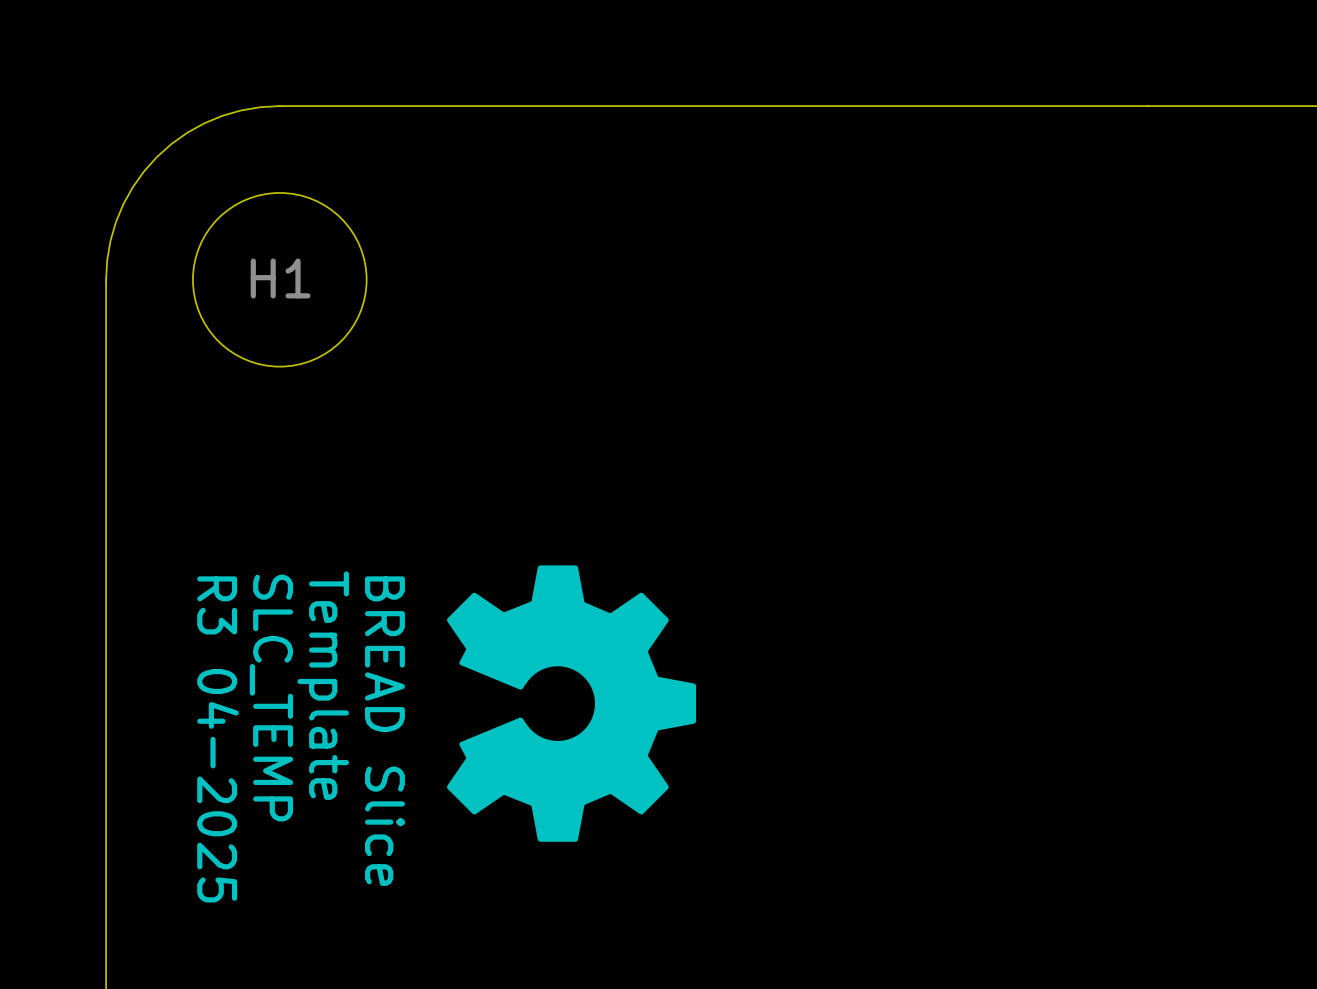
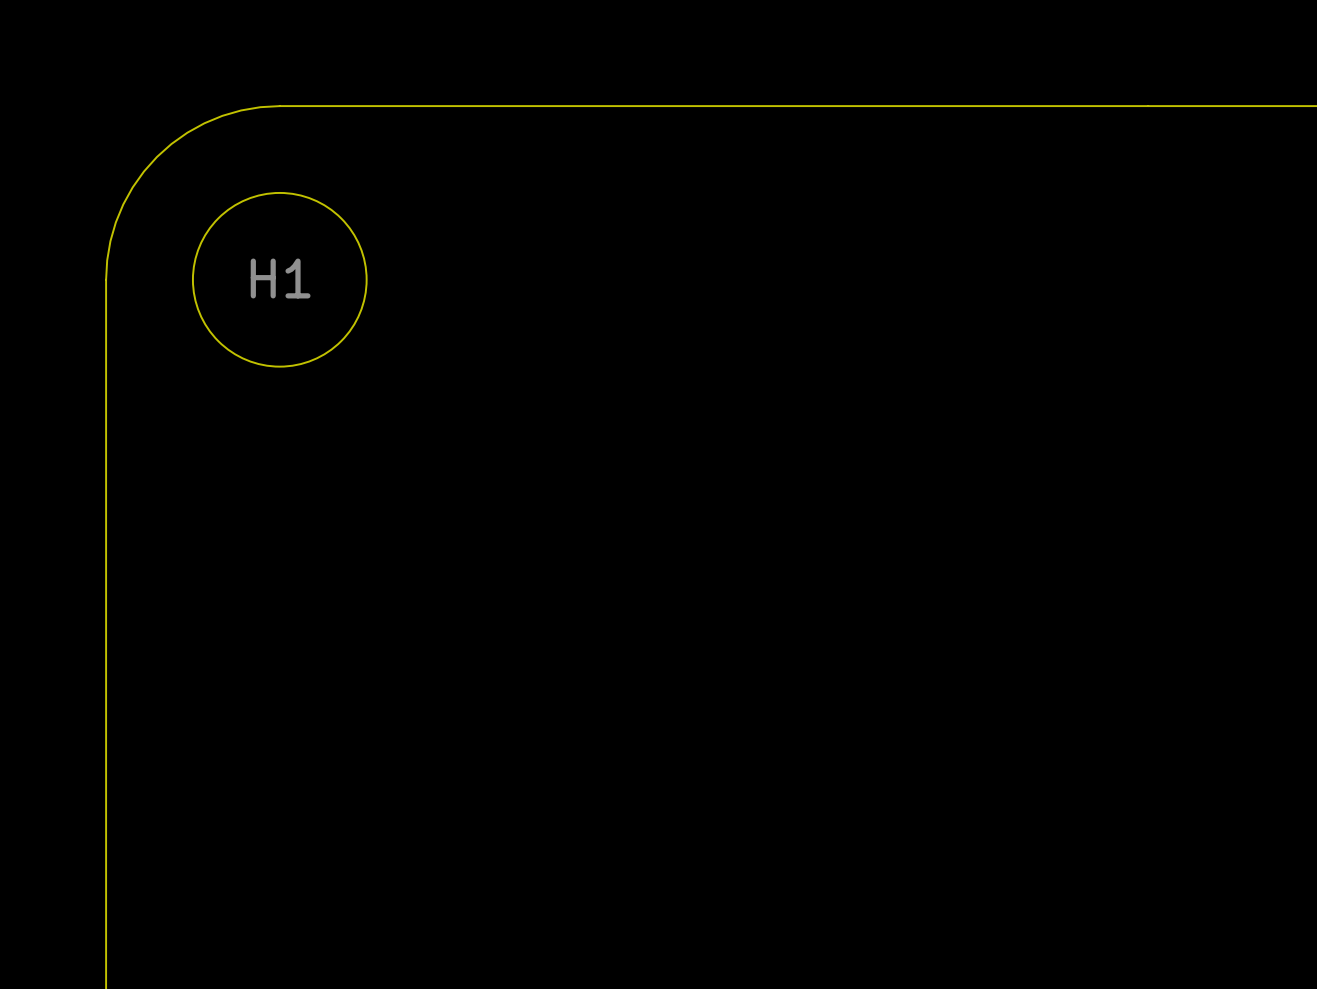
drawing: [447, 565, 697, 842] -> none
text: Template (323, 685) -> none
text: SLC_TEMP (271, 698) -> none
text: BREAD Slice (384, 731) -> none
text: R3 04-2025 (217, 739) -> none

